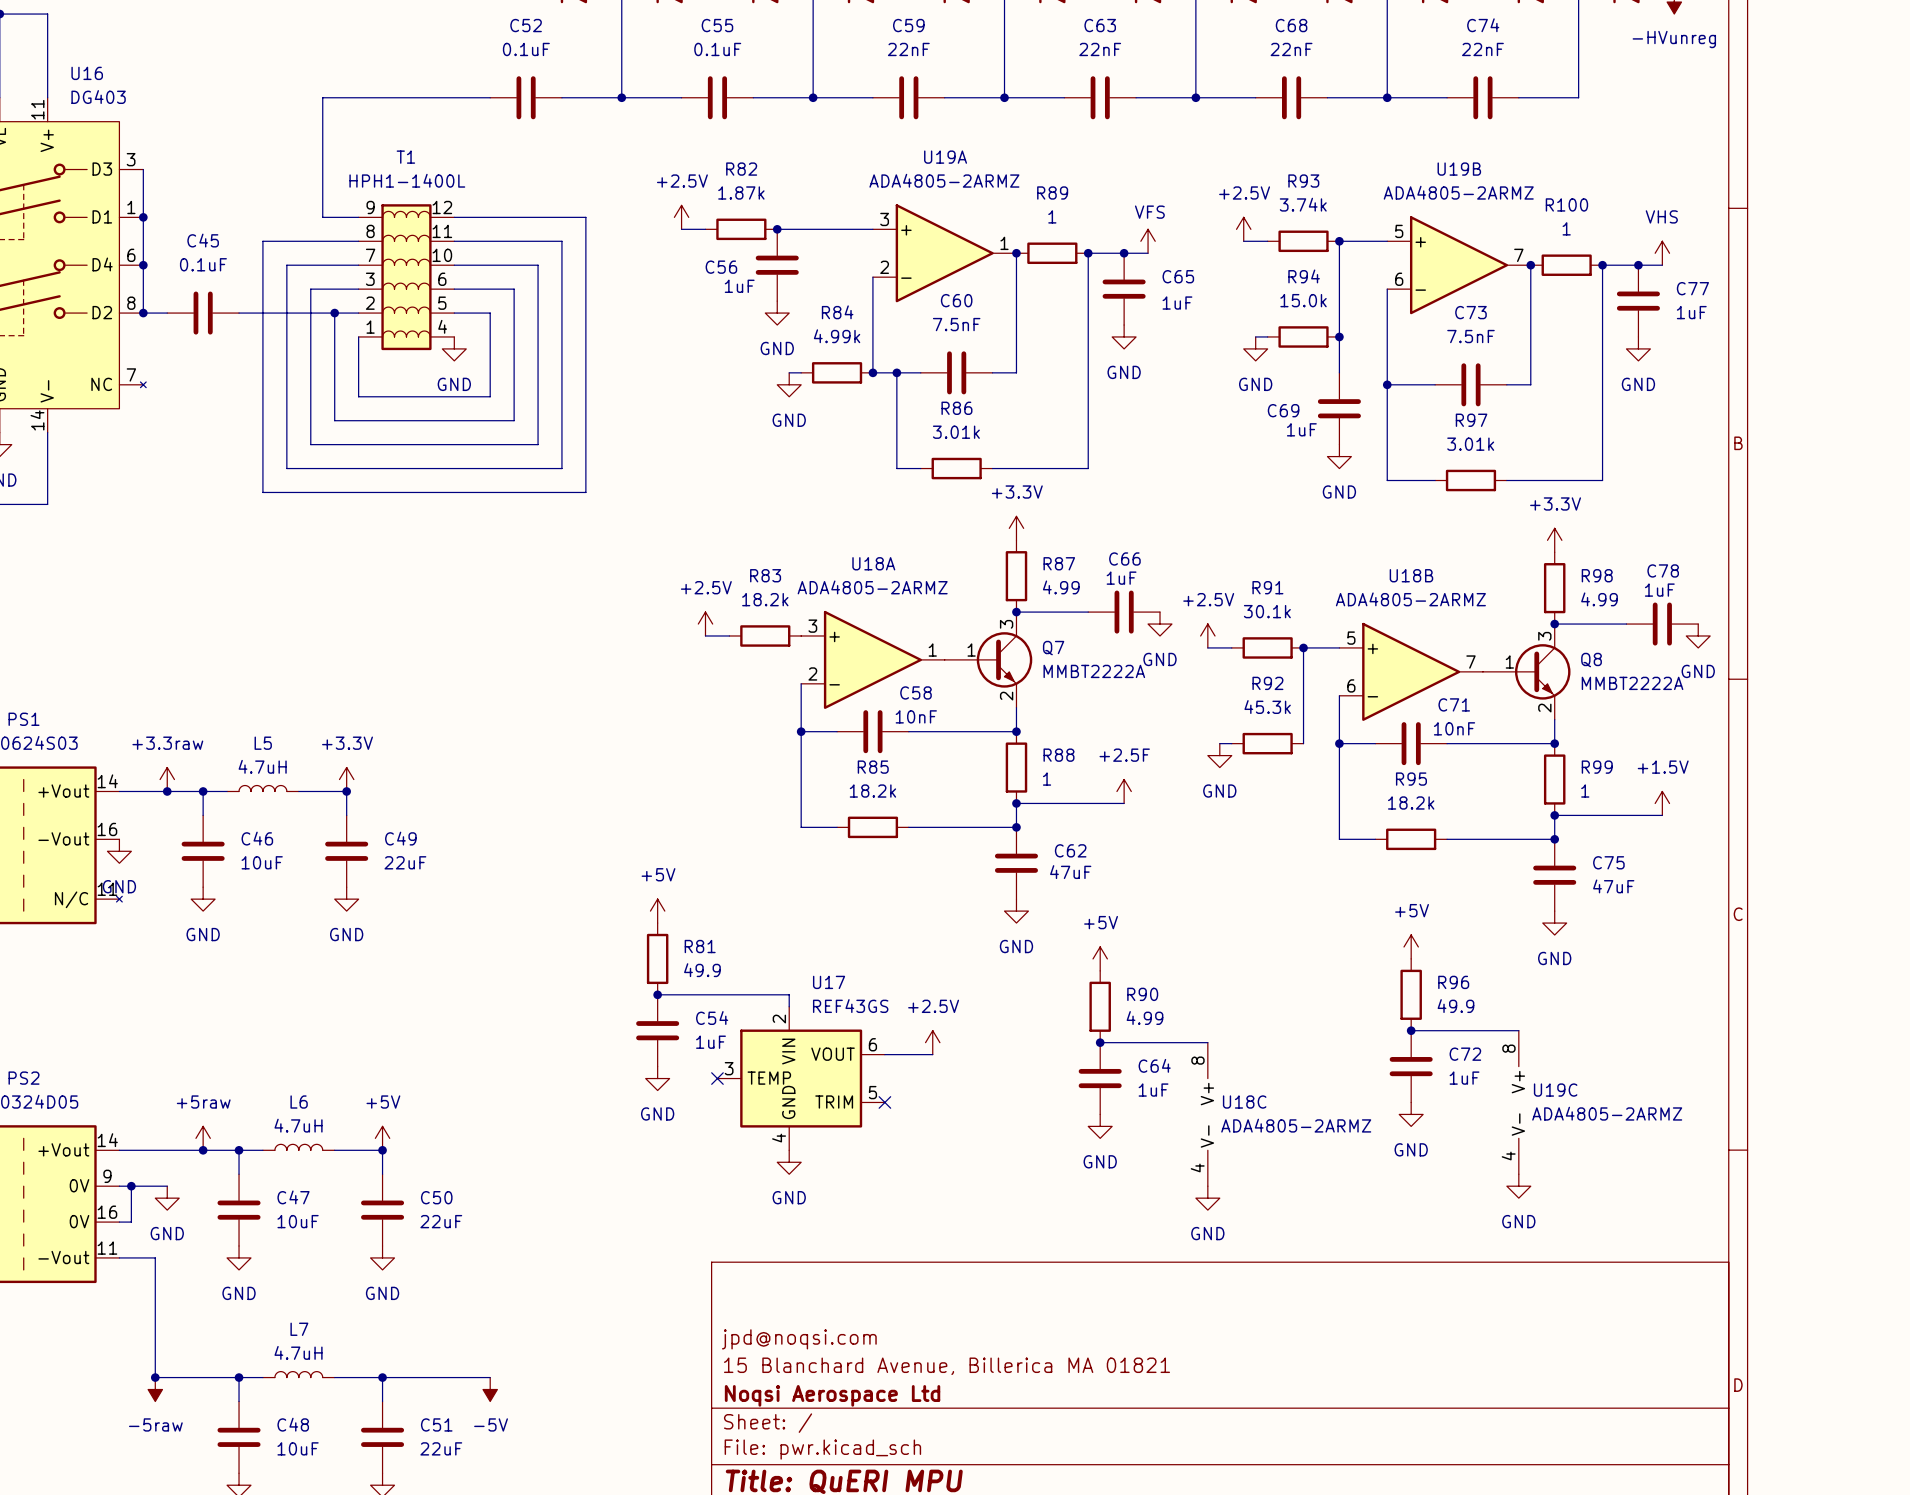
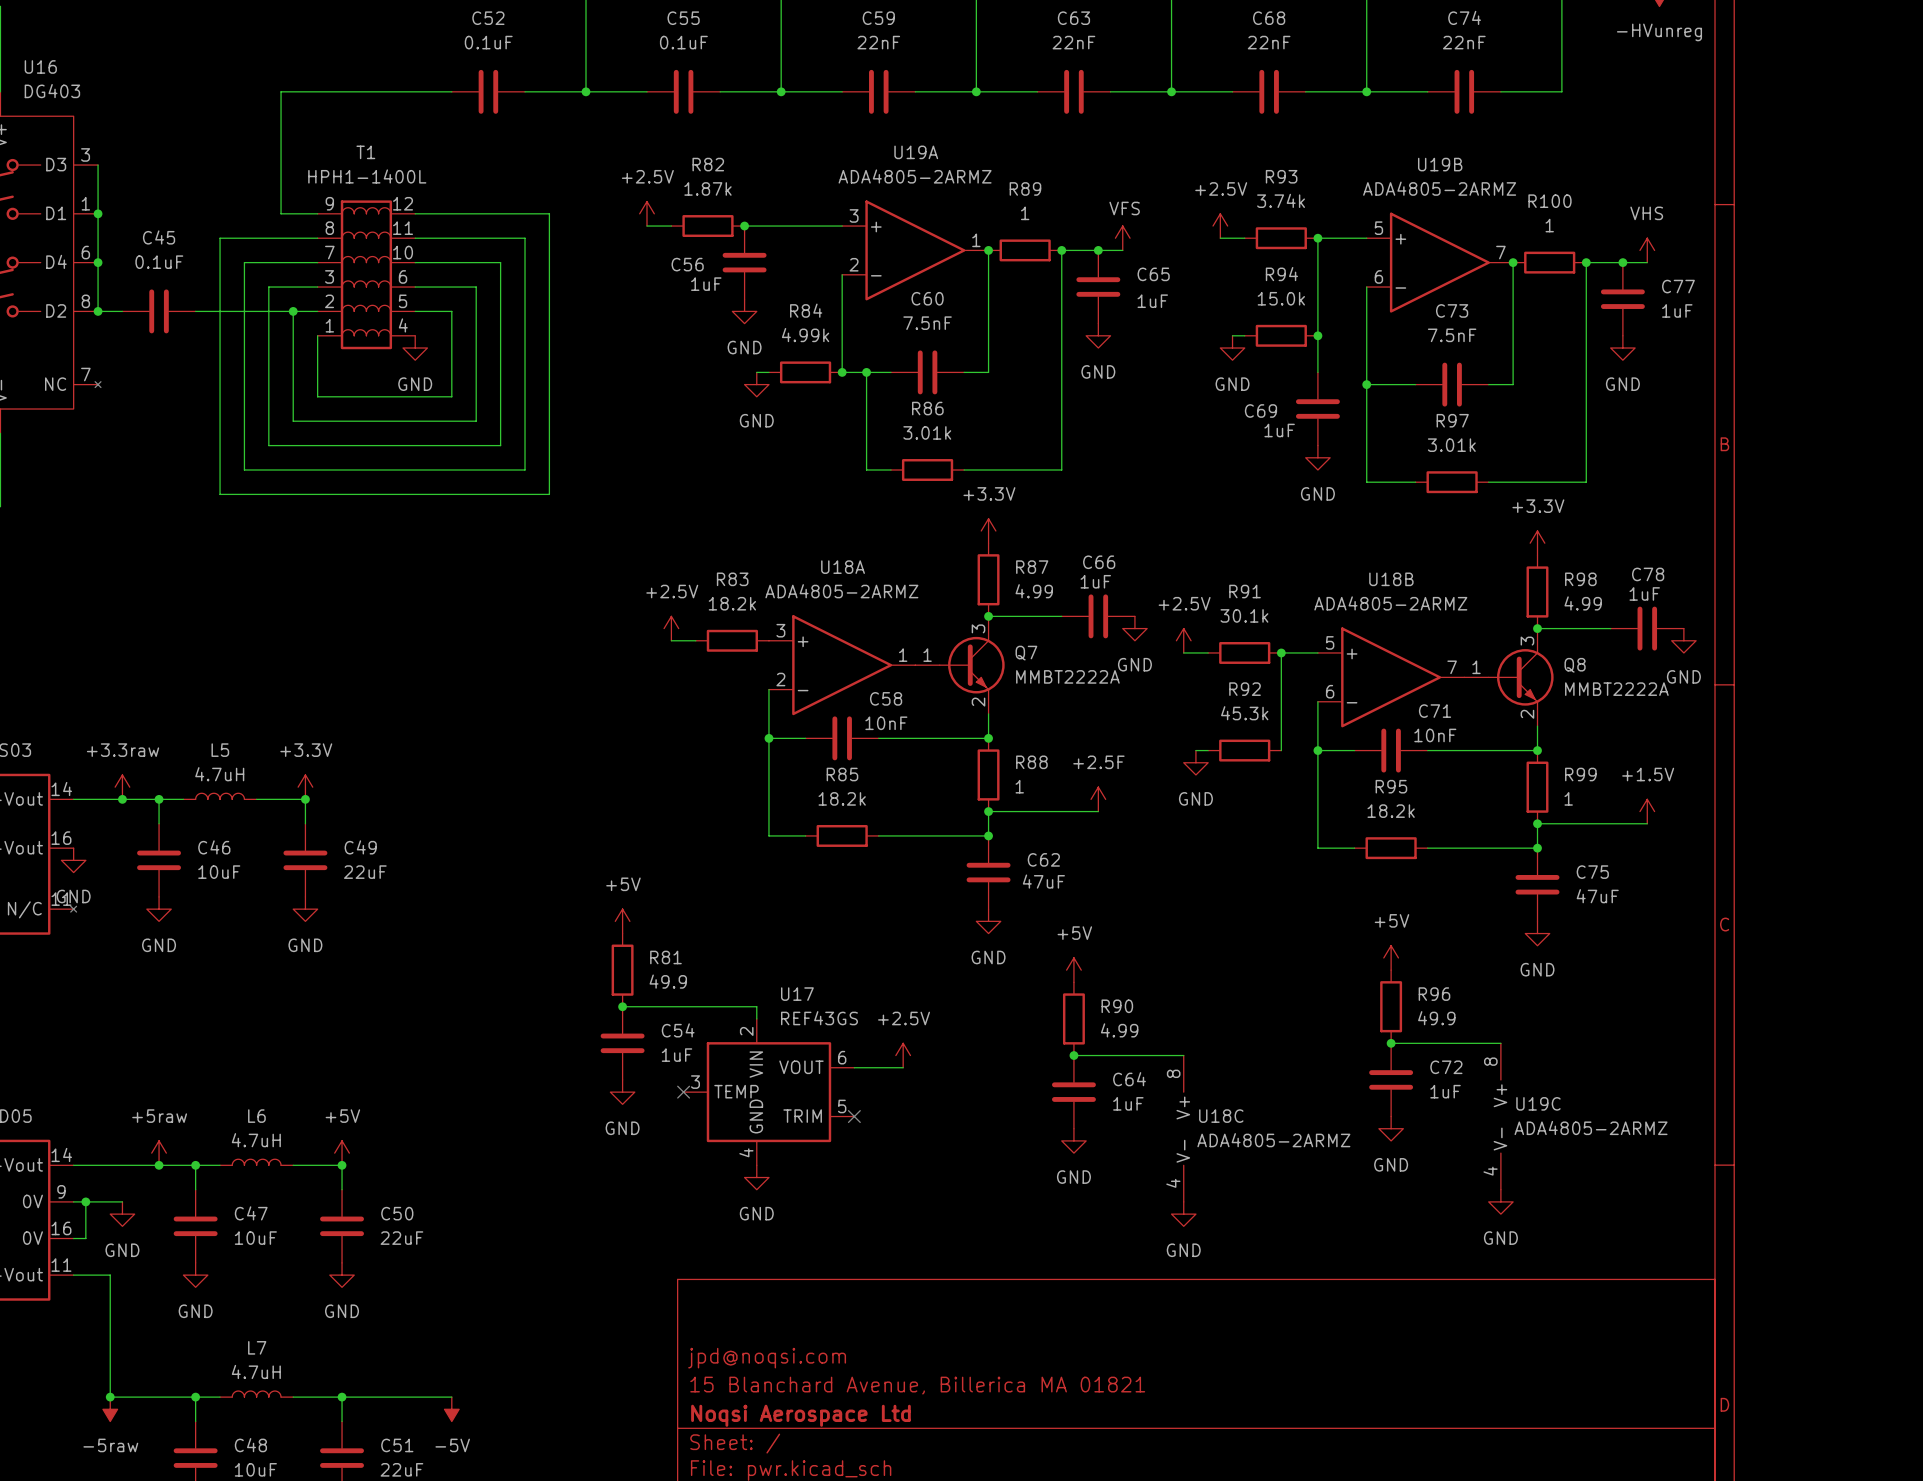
Q7 symbol: [944, 612, 1033, 708] -> [915, 616, 1005, 714]
Q8 symbol: [1482, 624, 1571, 720] -> [1464, 628, 1554, 727]

